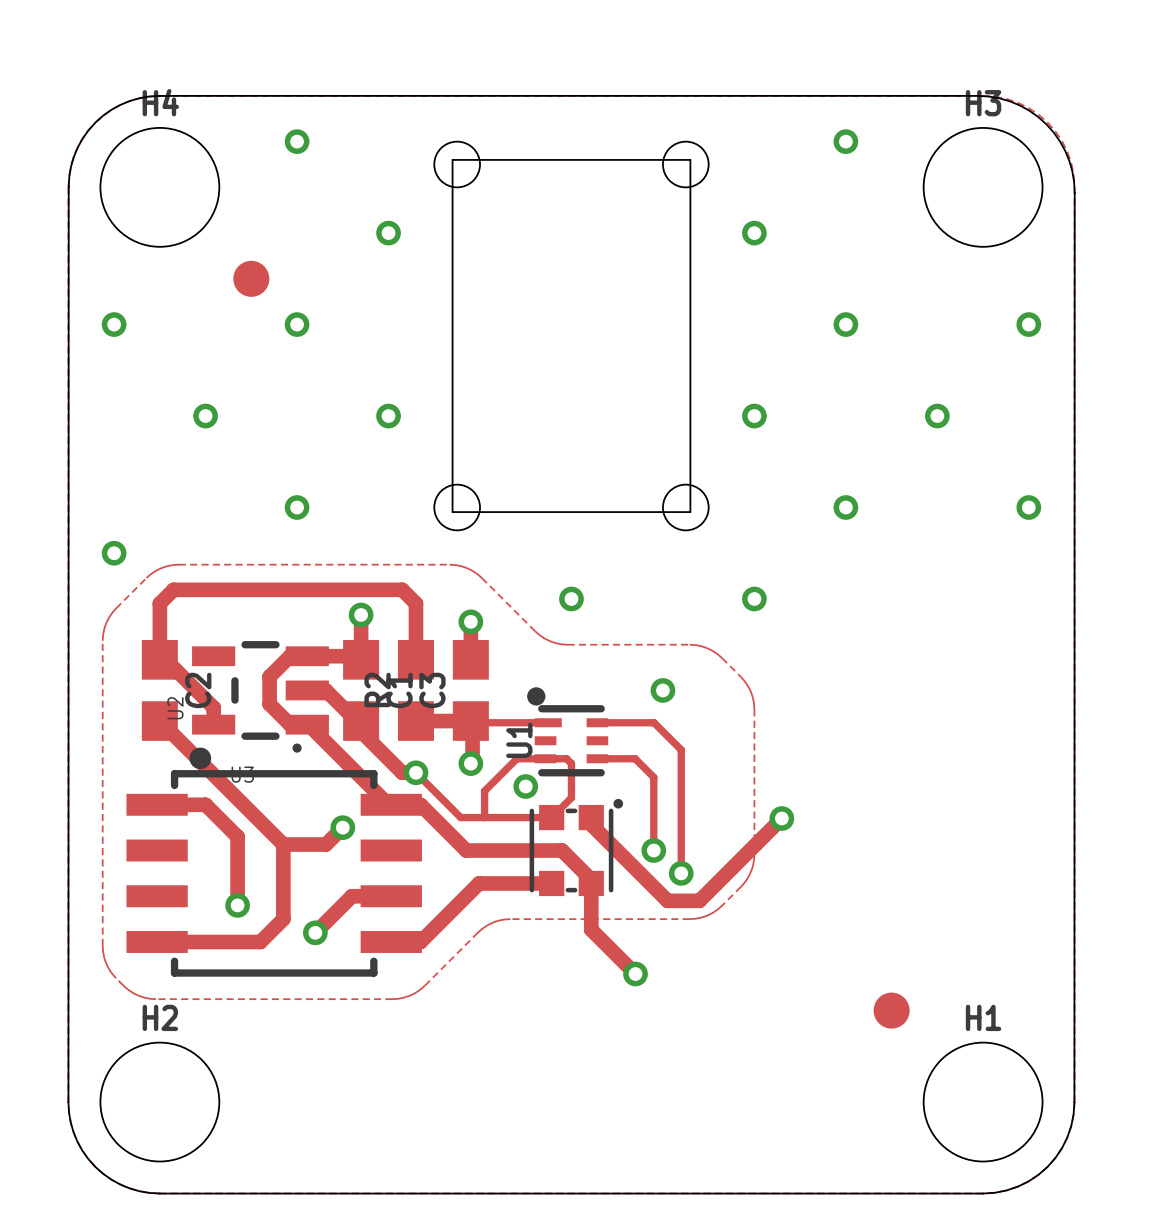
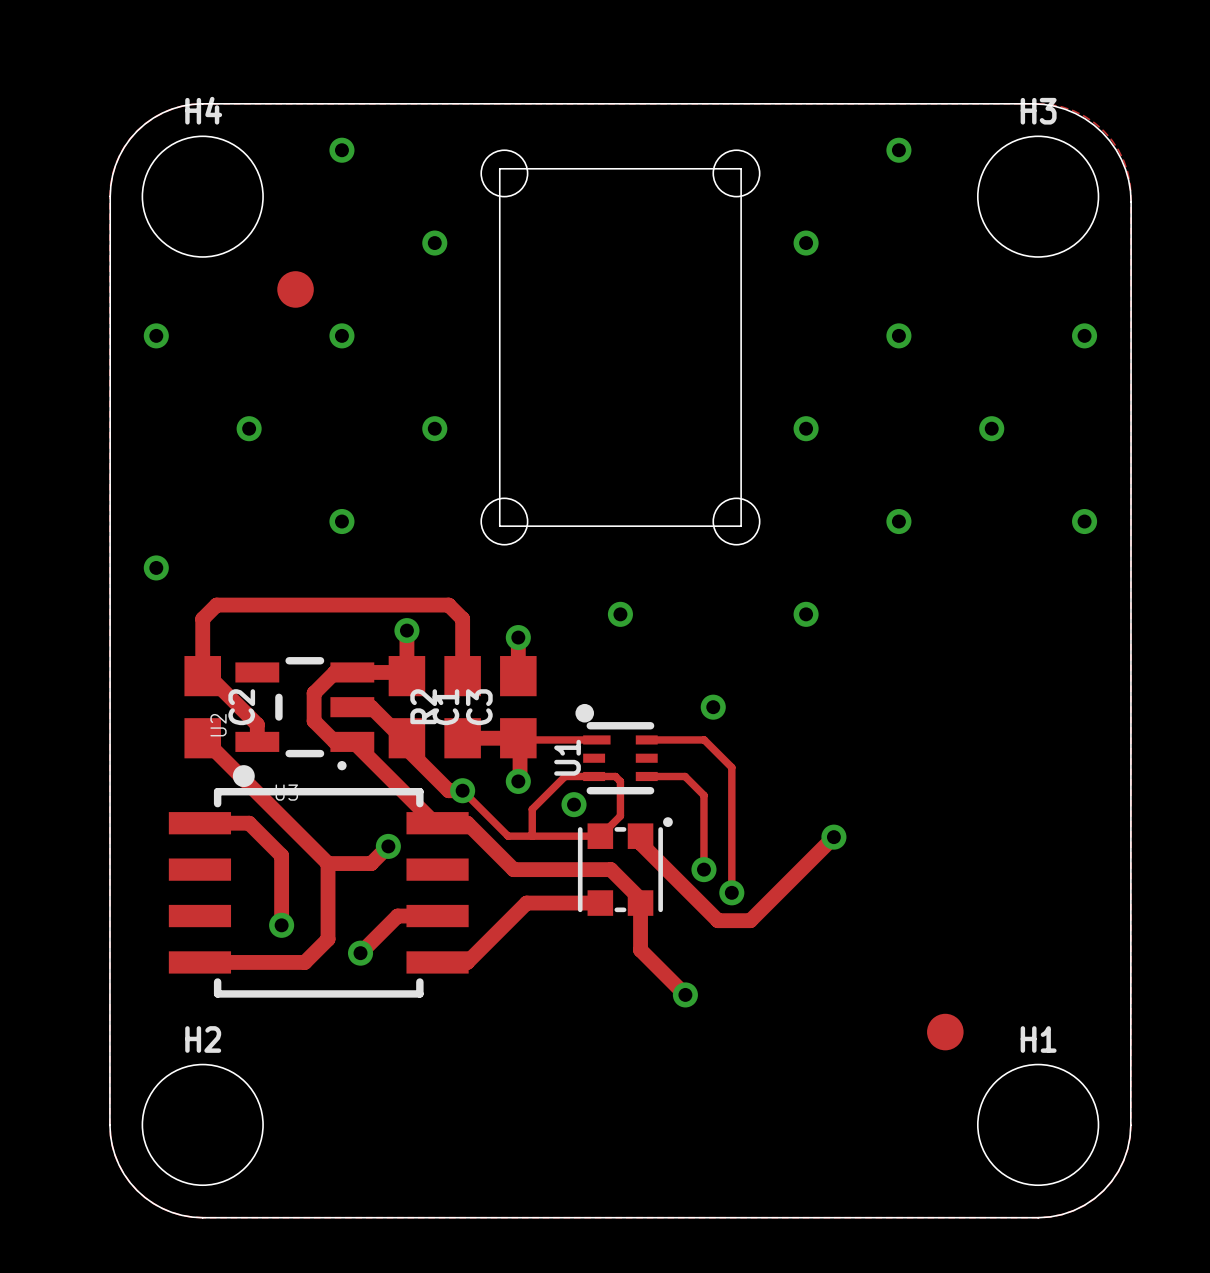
zone outline: (178, 564) (161, 568) (146, 578) (112, 612) (106, 623) (103, 634) (103, 951) (106, 963) (112, 973) (133, 993) (144, 997) (155, 999) (398, 998) (409, 995) (420, 989) (478, 932) (492, 922) (510, 919) (695, 918) (707, 915) (717, 909) (748, 877) (752, 866) (754, 854) (754, 703) (750, 691) (744, 681) (712, 650) (701, 646) (689, 644) (555, 643) (544, 638) (535, 631) (477, 574) (467, 568) (455, 565) (178, 564) -> none

